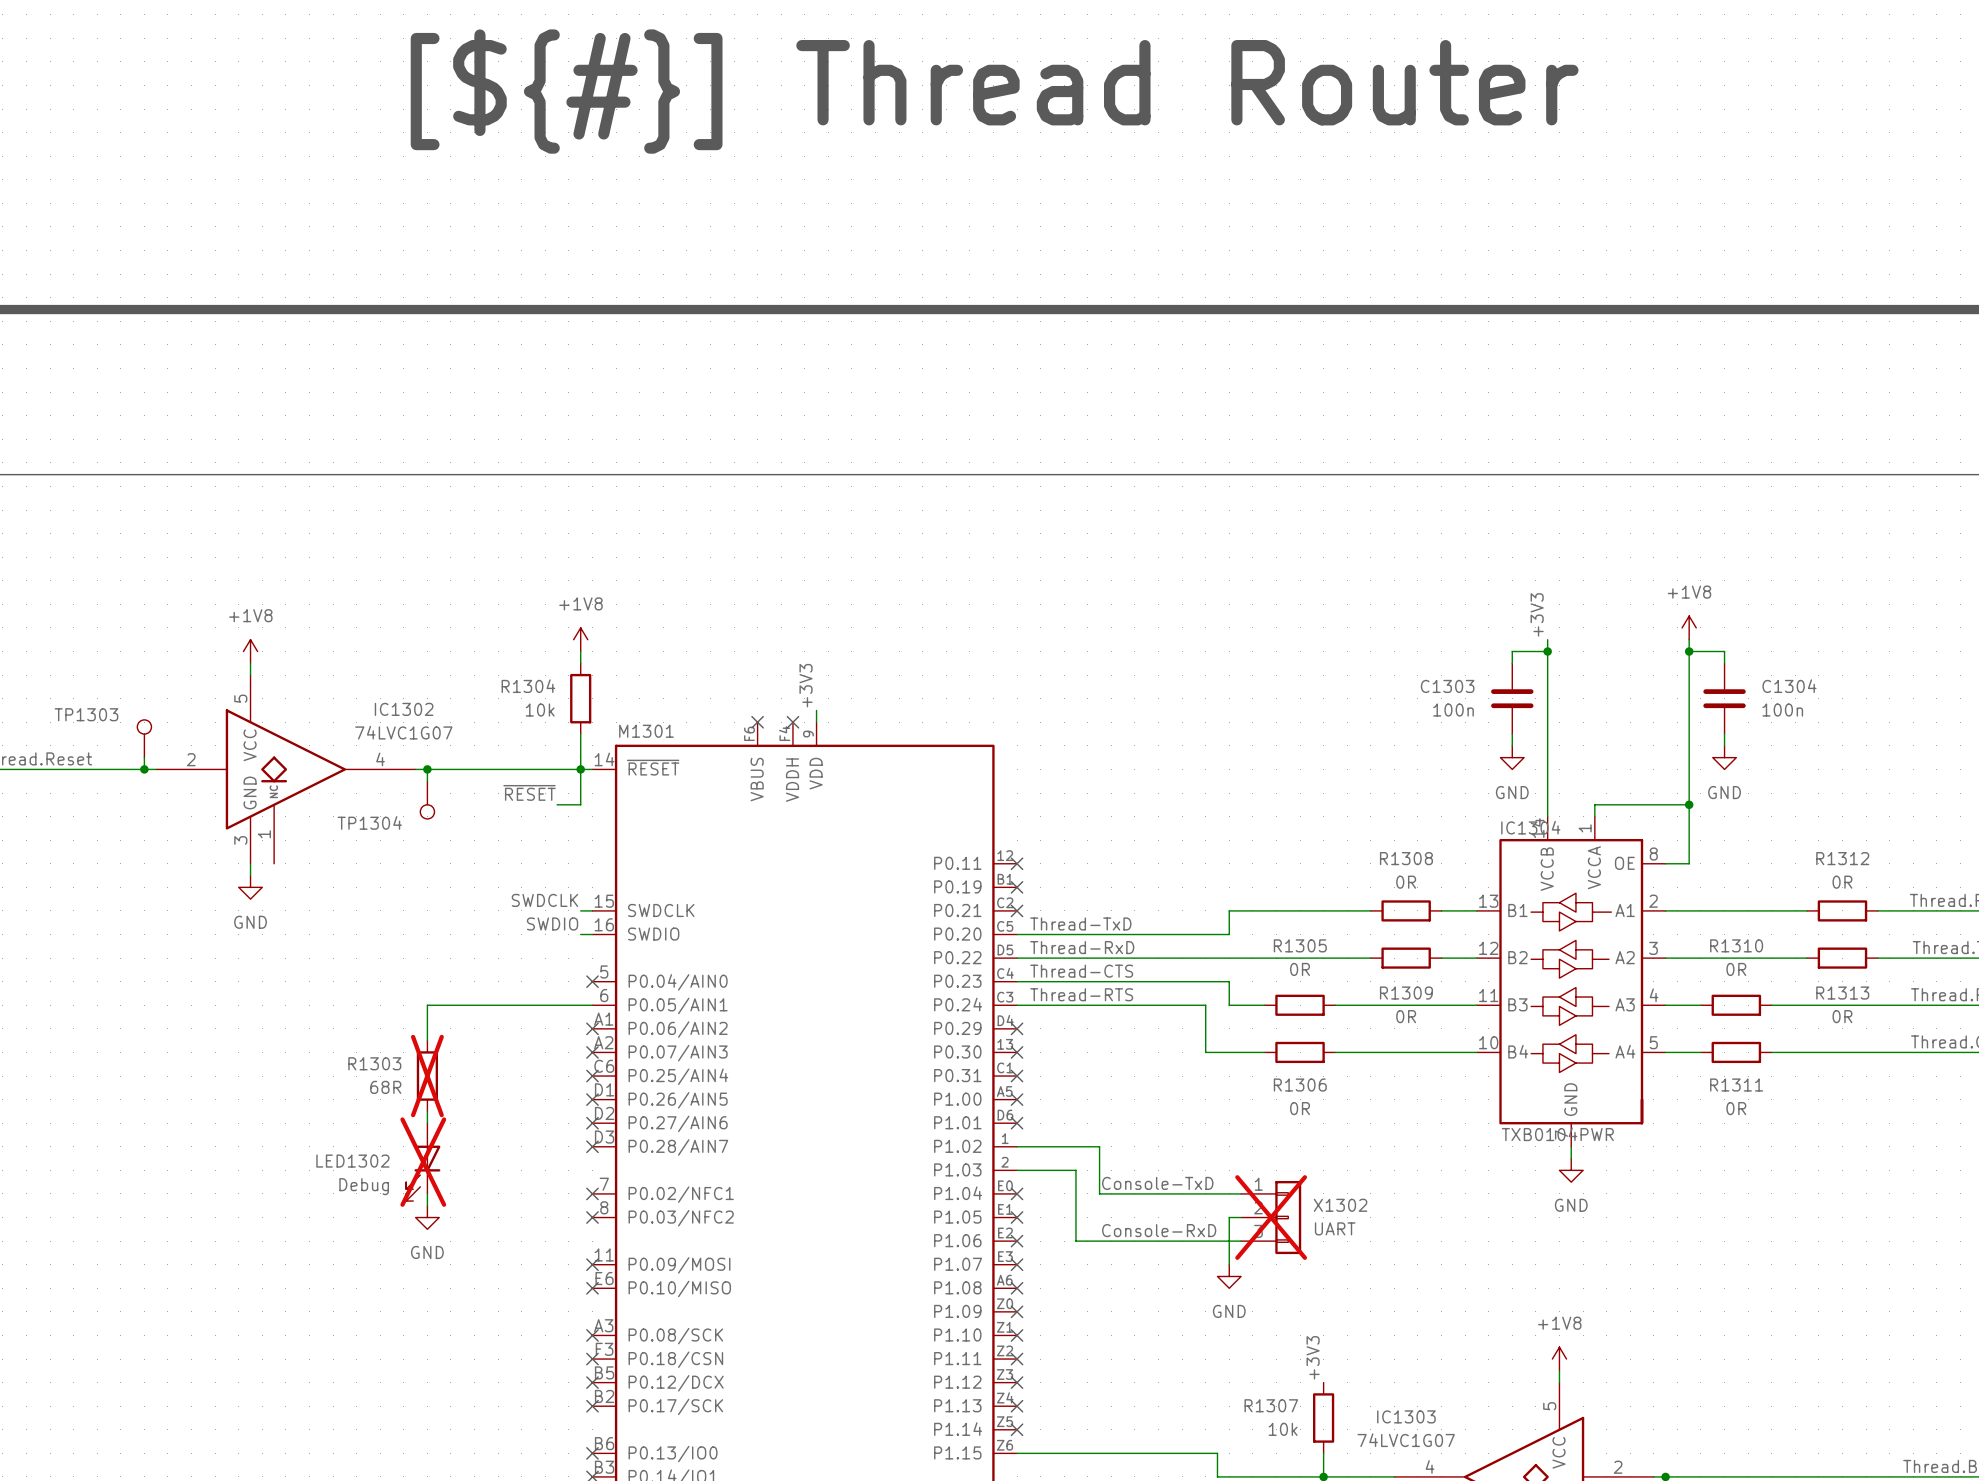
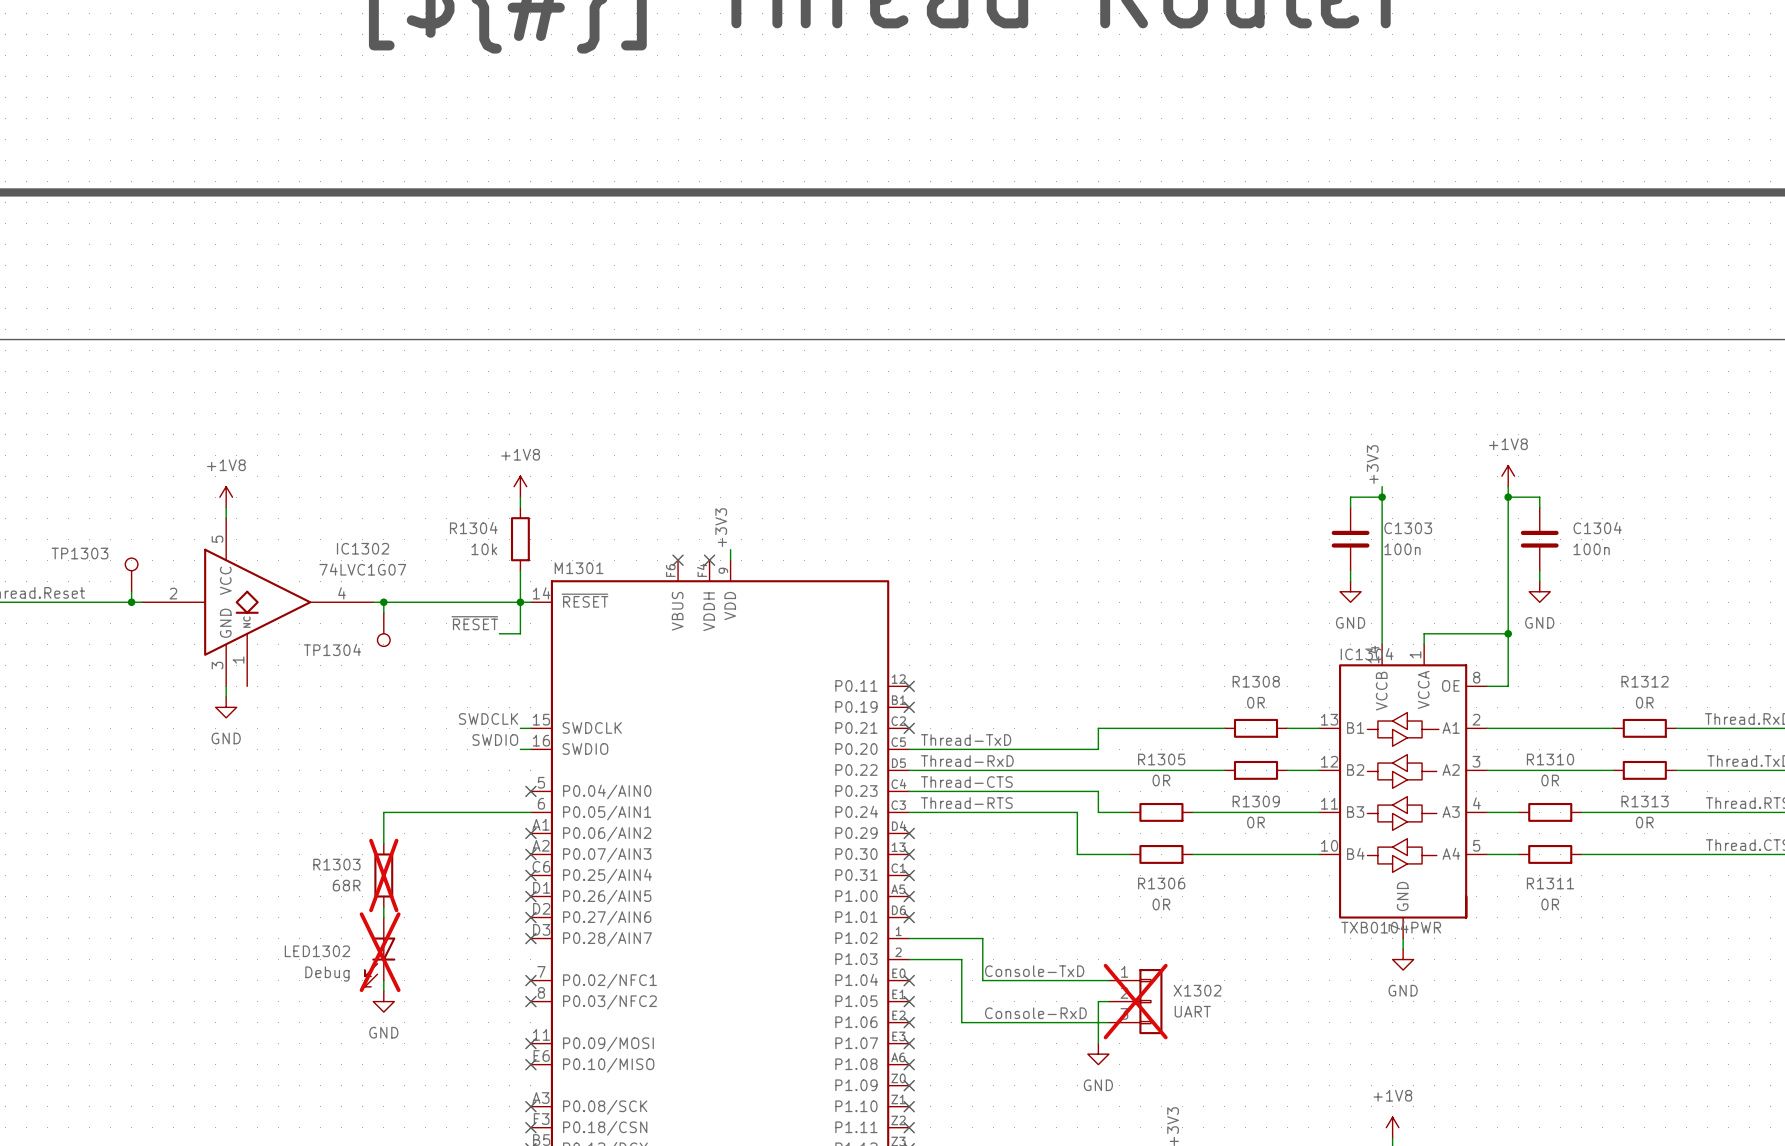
C1303 name position: C1303 (1447, 686) -> C1303 (1408, 528)
C1303 value position: 100n (1453, 710) -> 100n (1402, 549)

